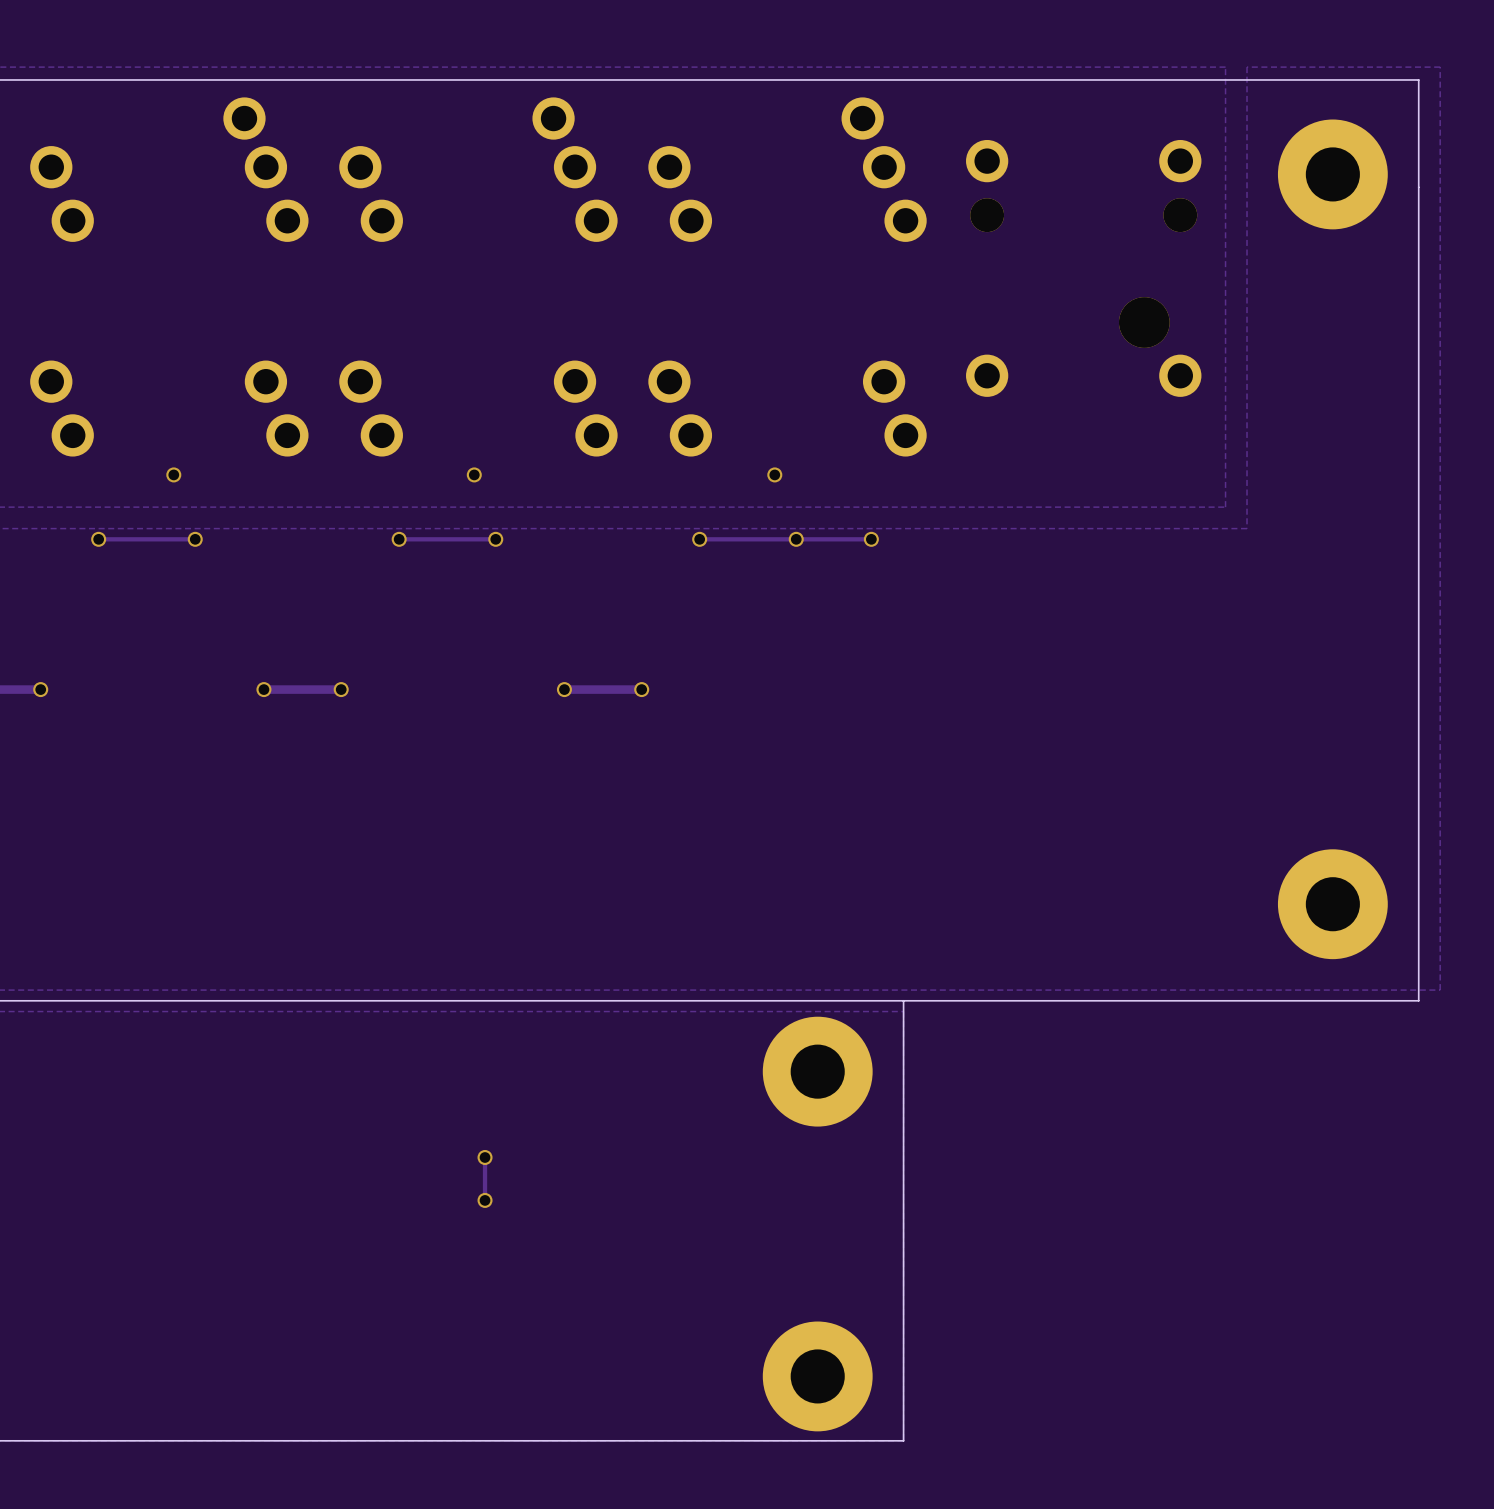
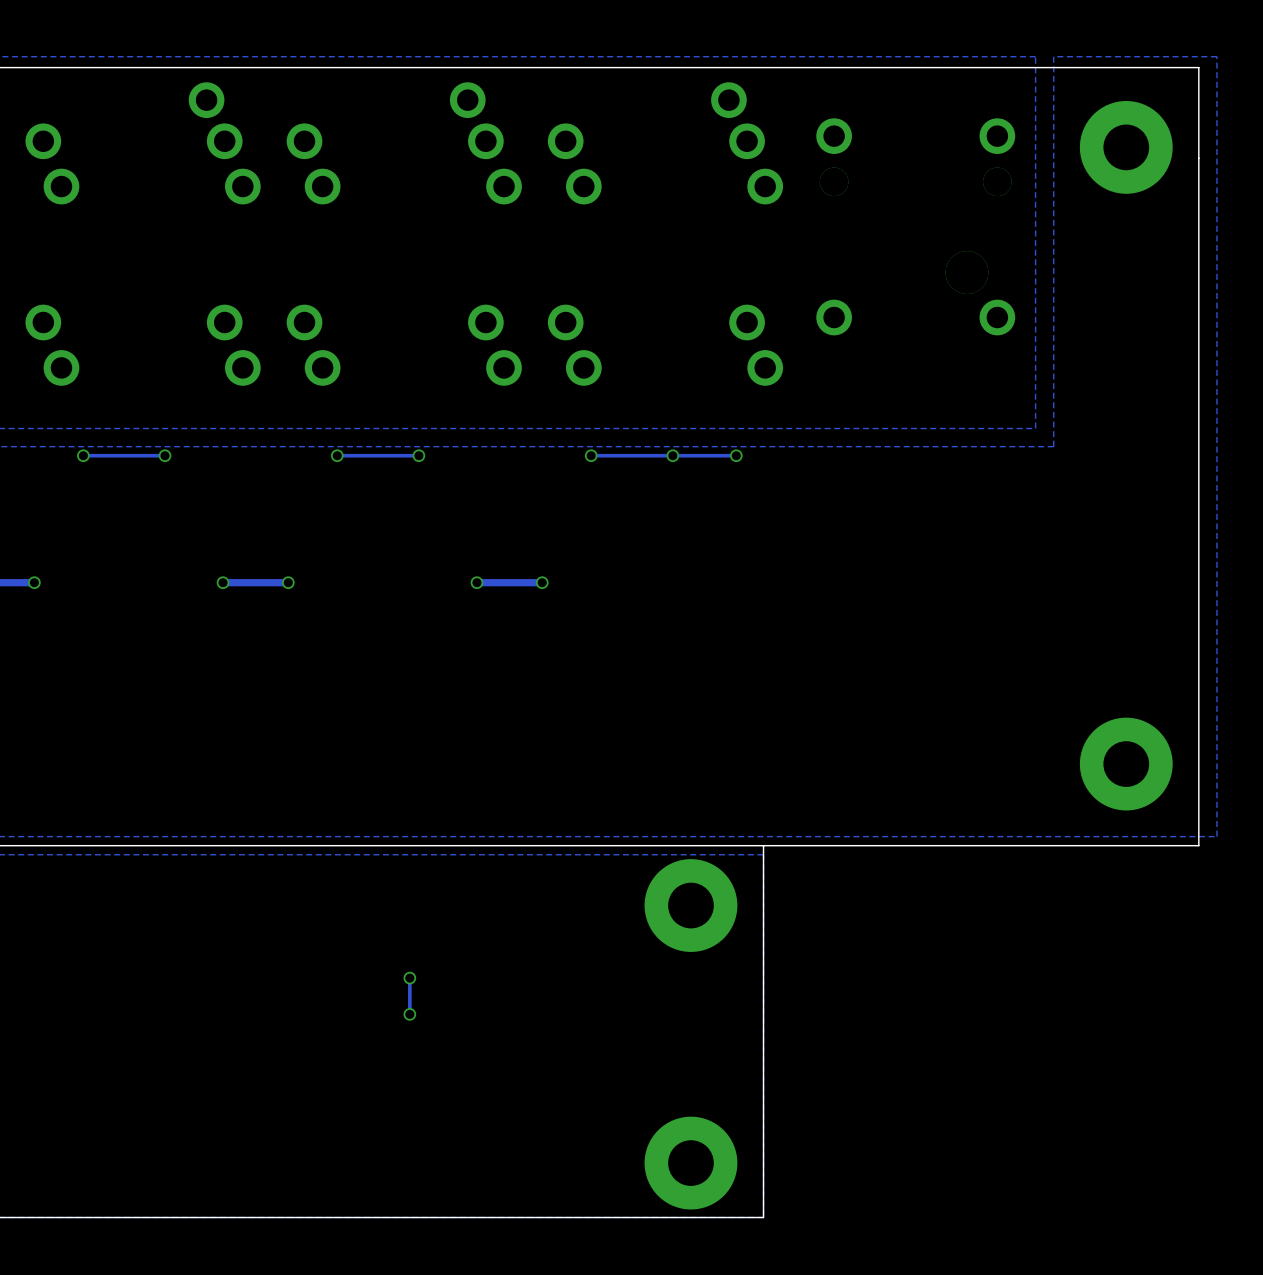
via: (173, 474) -> none
via: (474, 474) -> none
via: (774, 474) -> none

